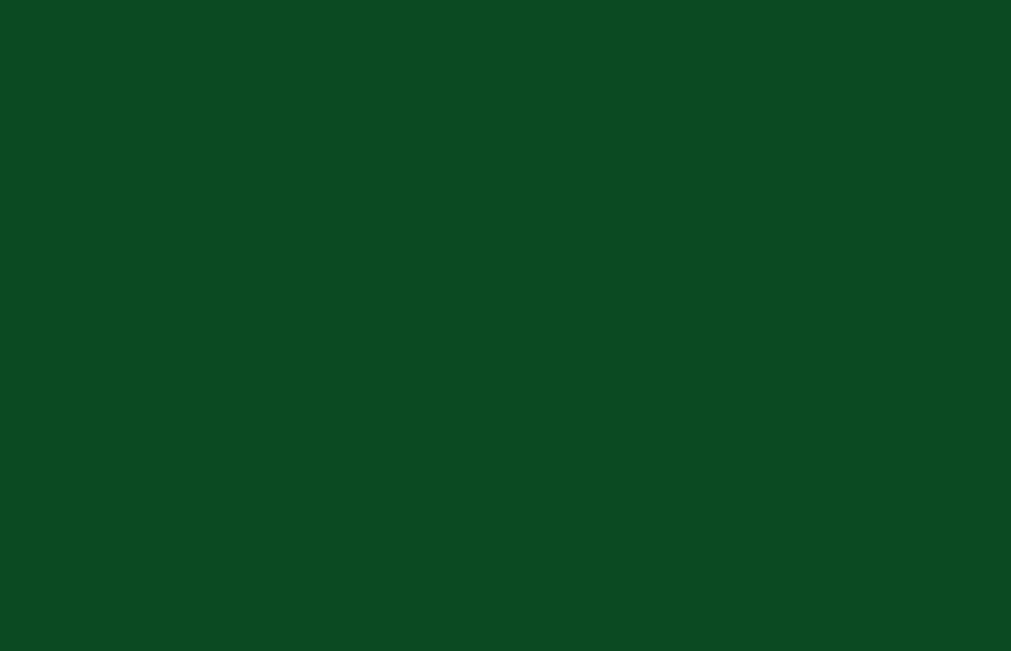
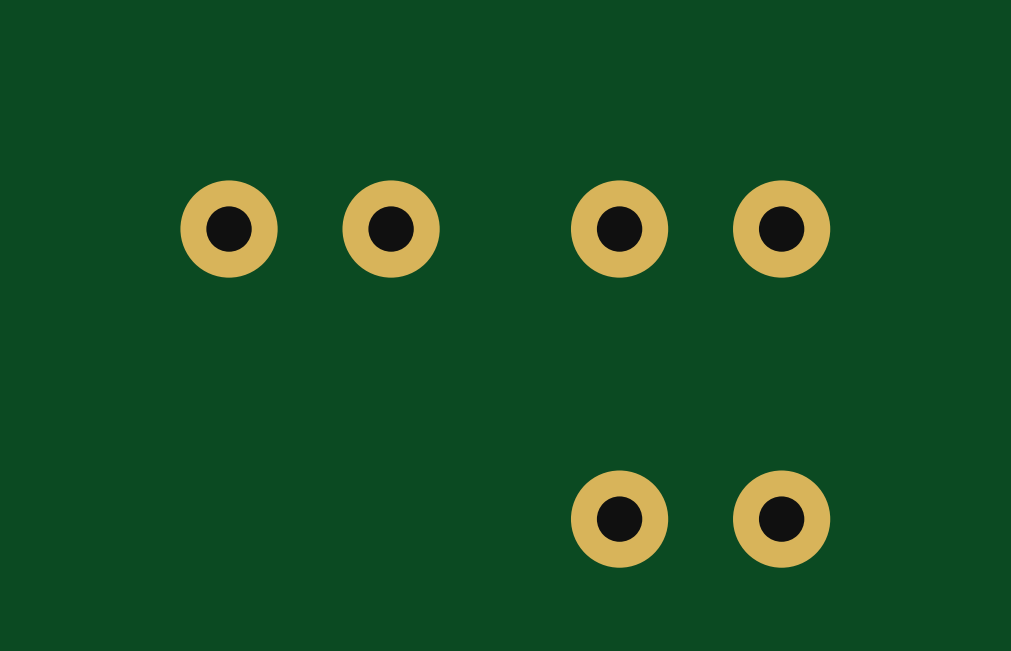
part: none -> (310, 229)
part: none -> (700, 229)
part: none -> (700, 519)

